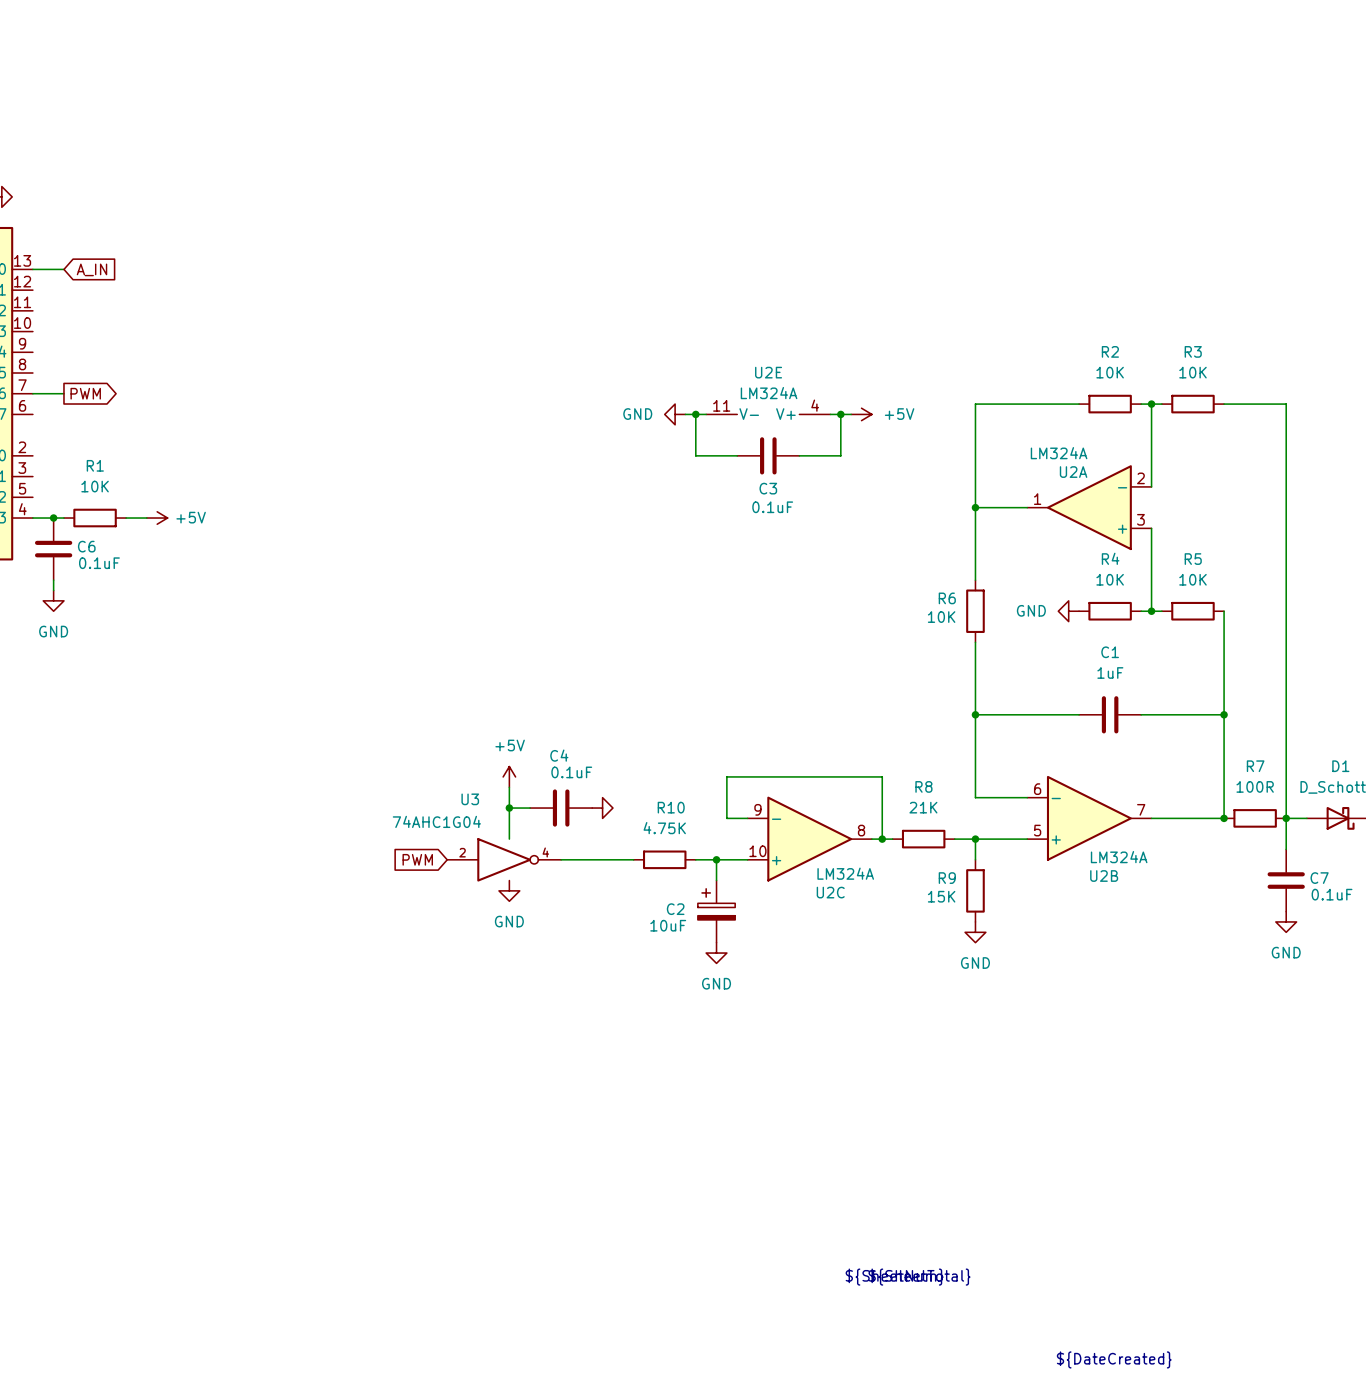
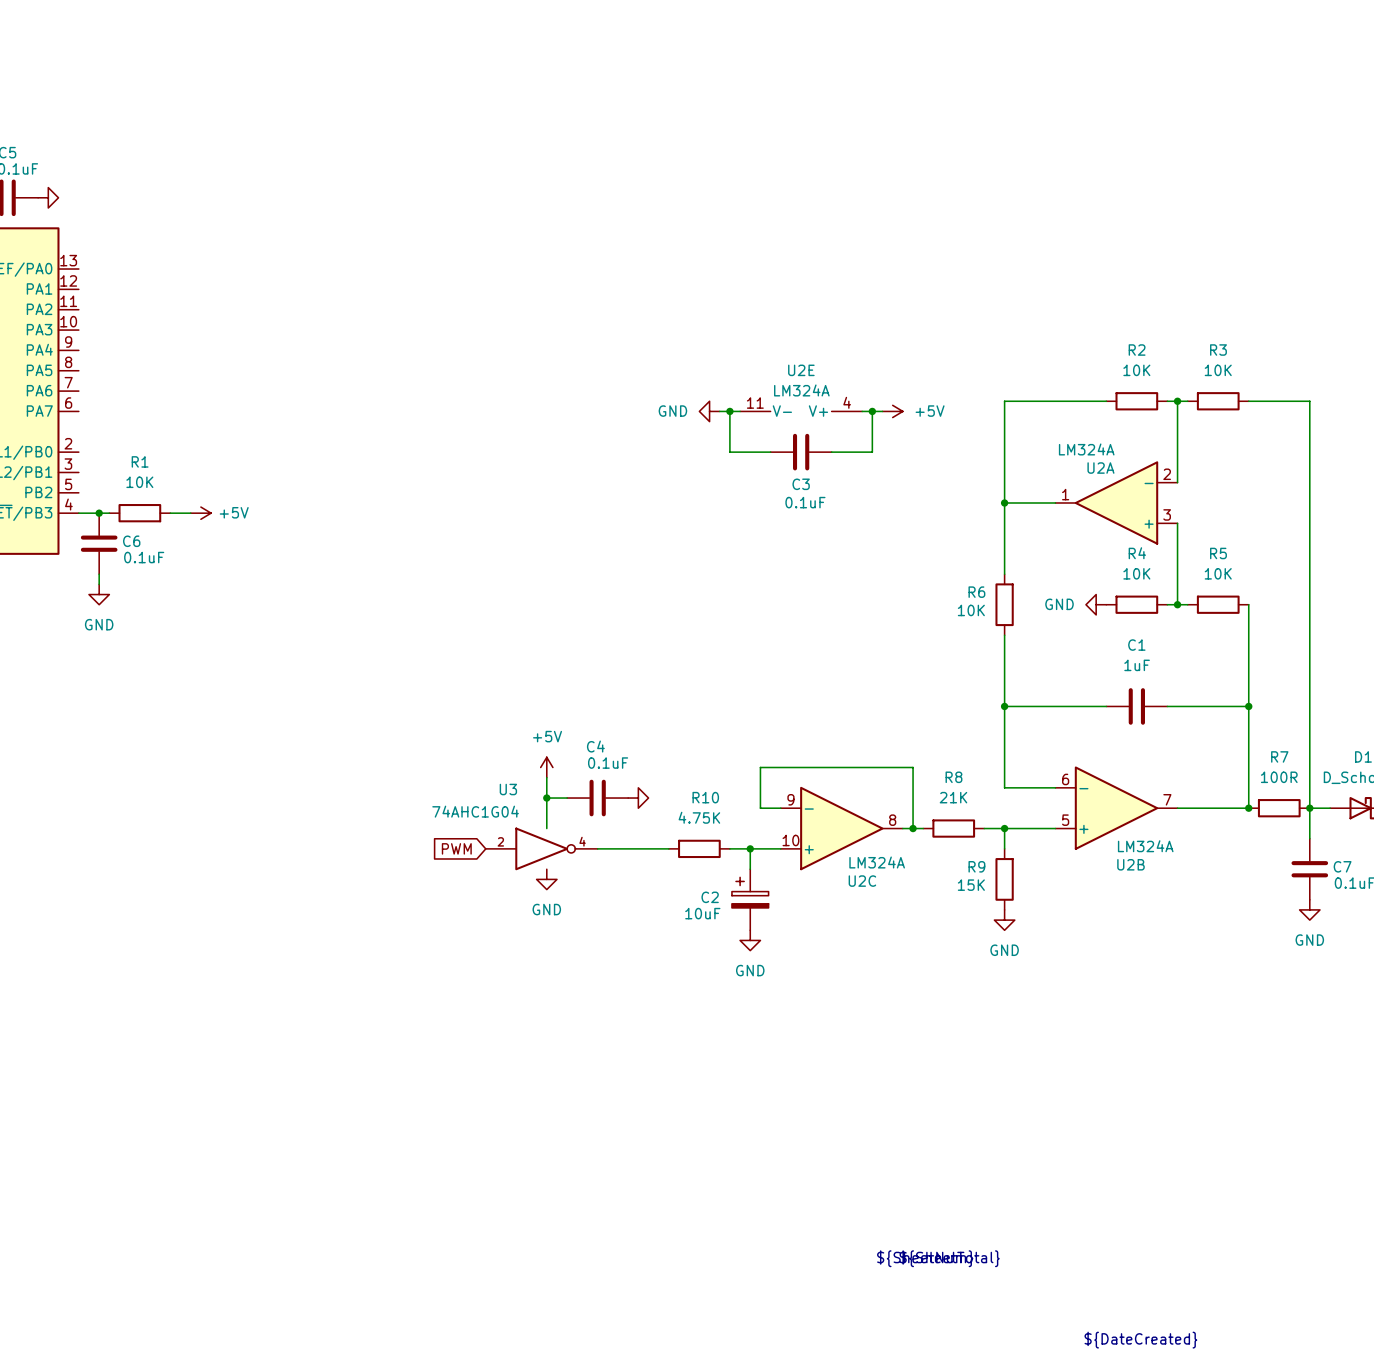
wire: (32, 269) (63, 269) -> none
global label: A_IN (91, 269) -> none
wire: (32, 393) (63, 393) -> none
global label: PWM (85, 393) -> none

